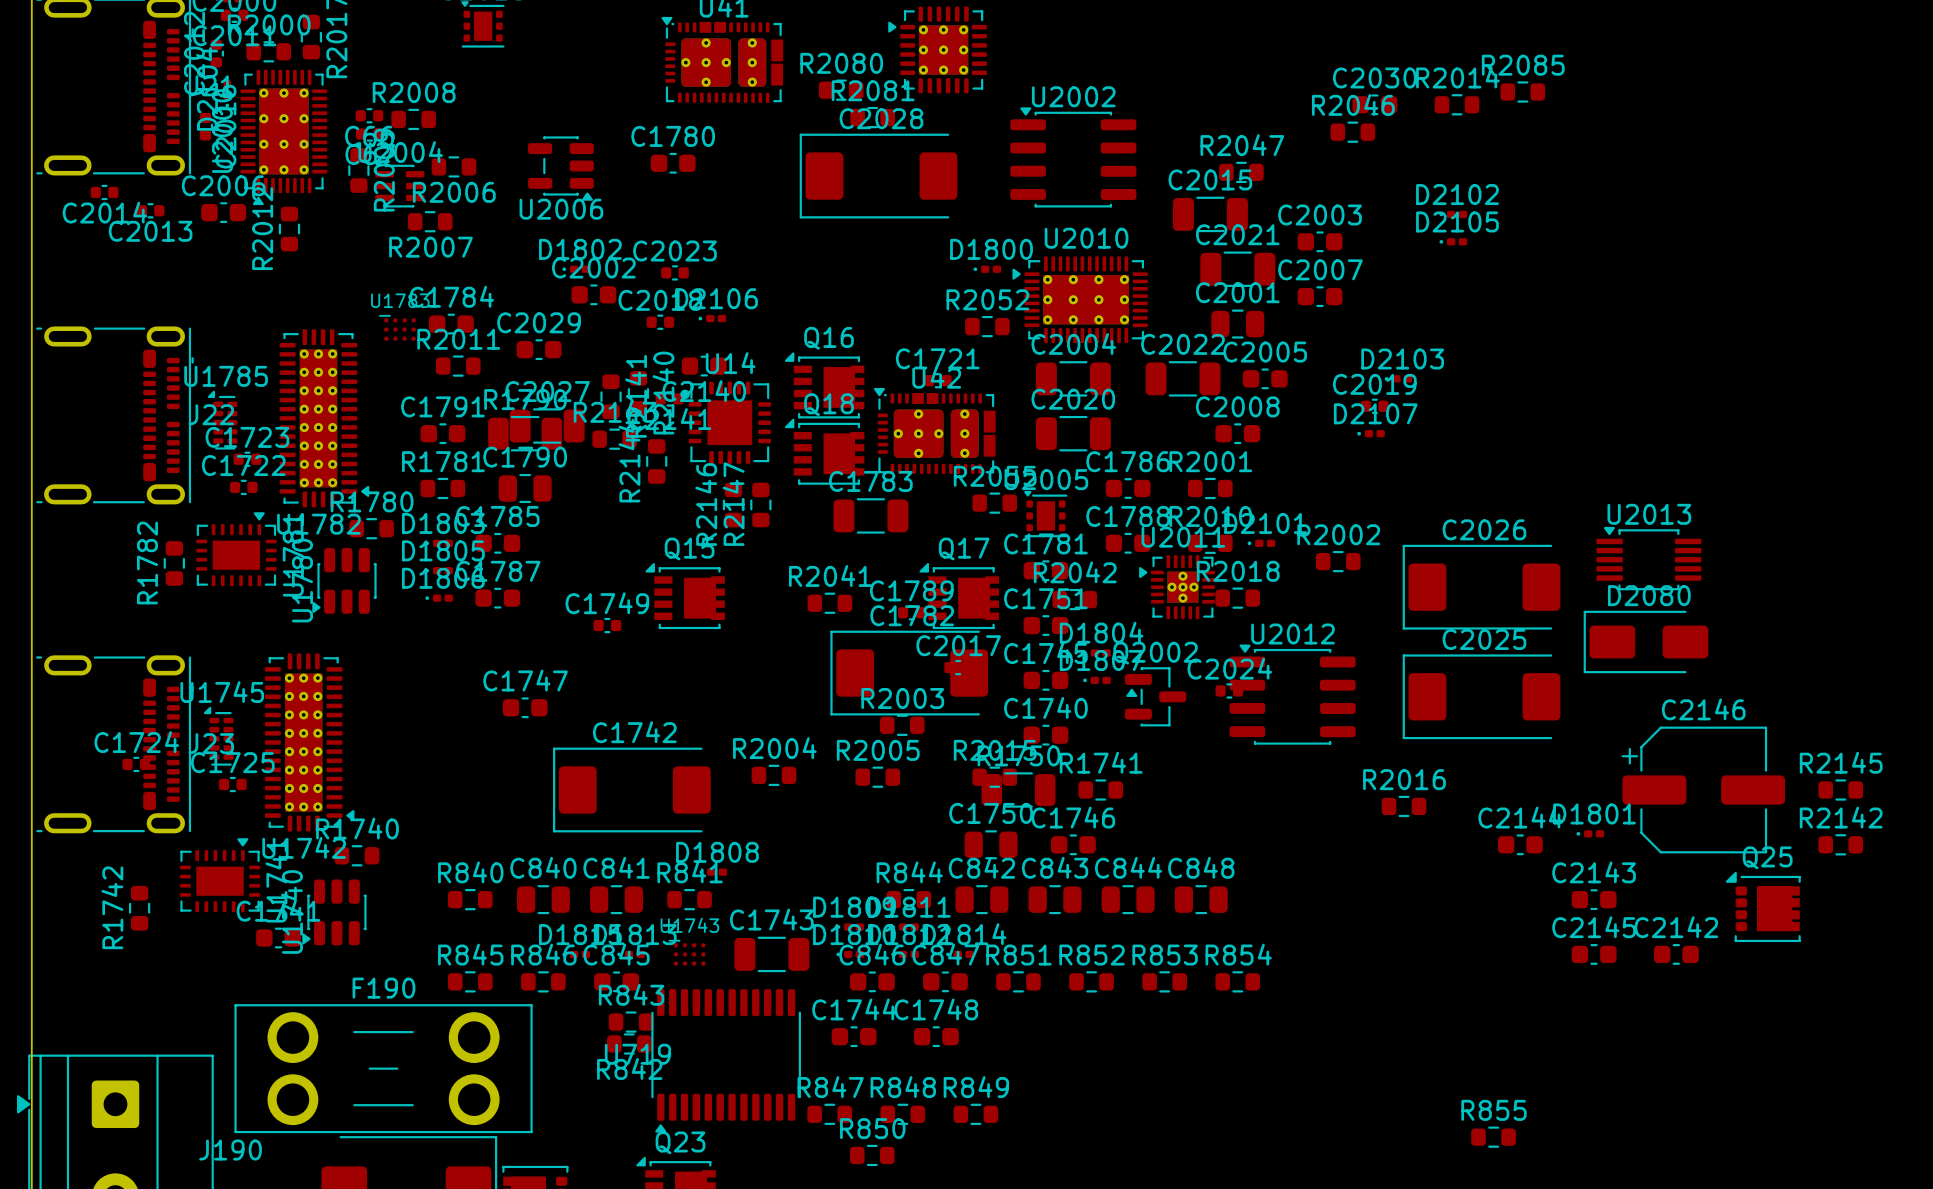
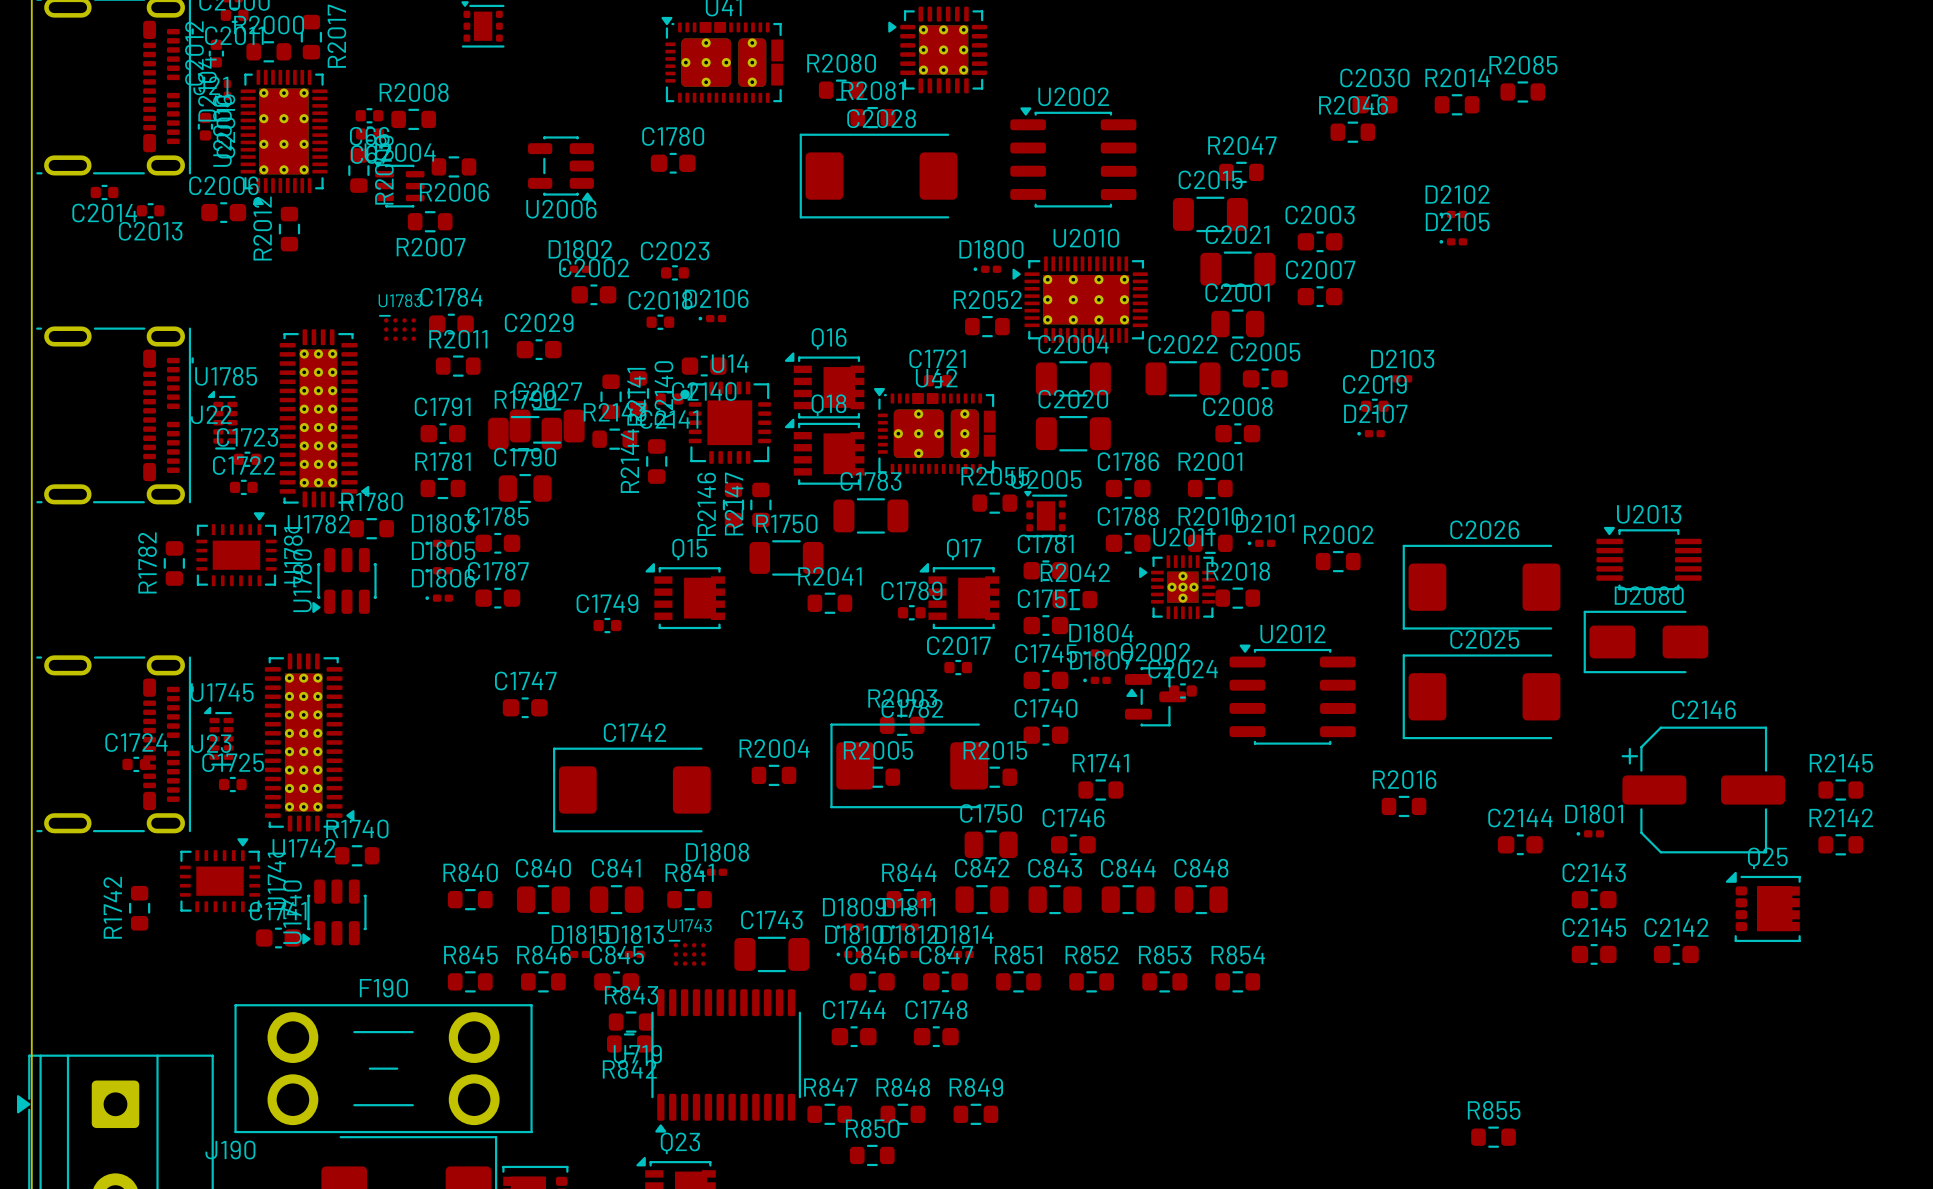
C1782 position: (909, 673) -> (909, 765)
C2024 position: (1229, 690) -> (1182, 690)
R1750 position: (1018, 789) -> (786, 557)

